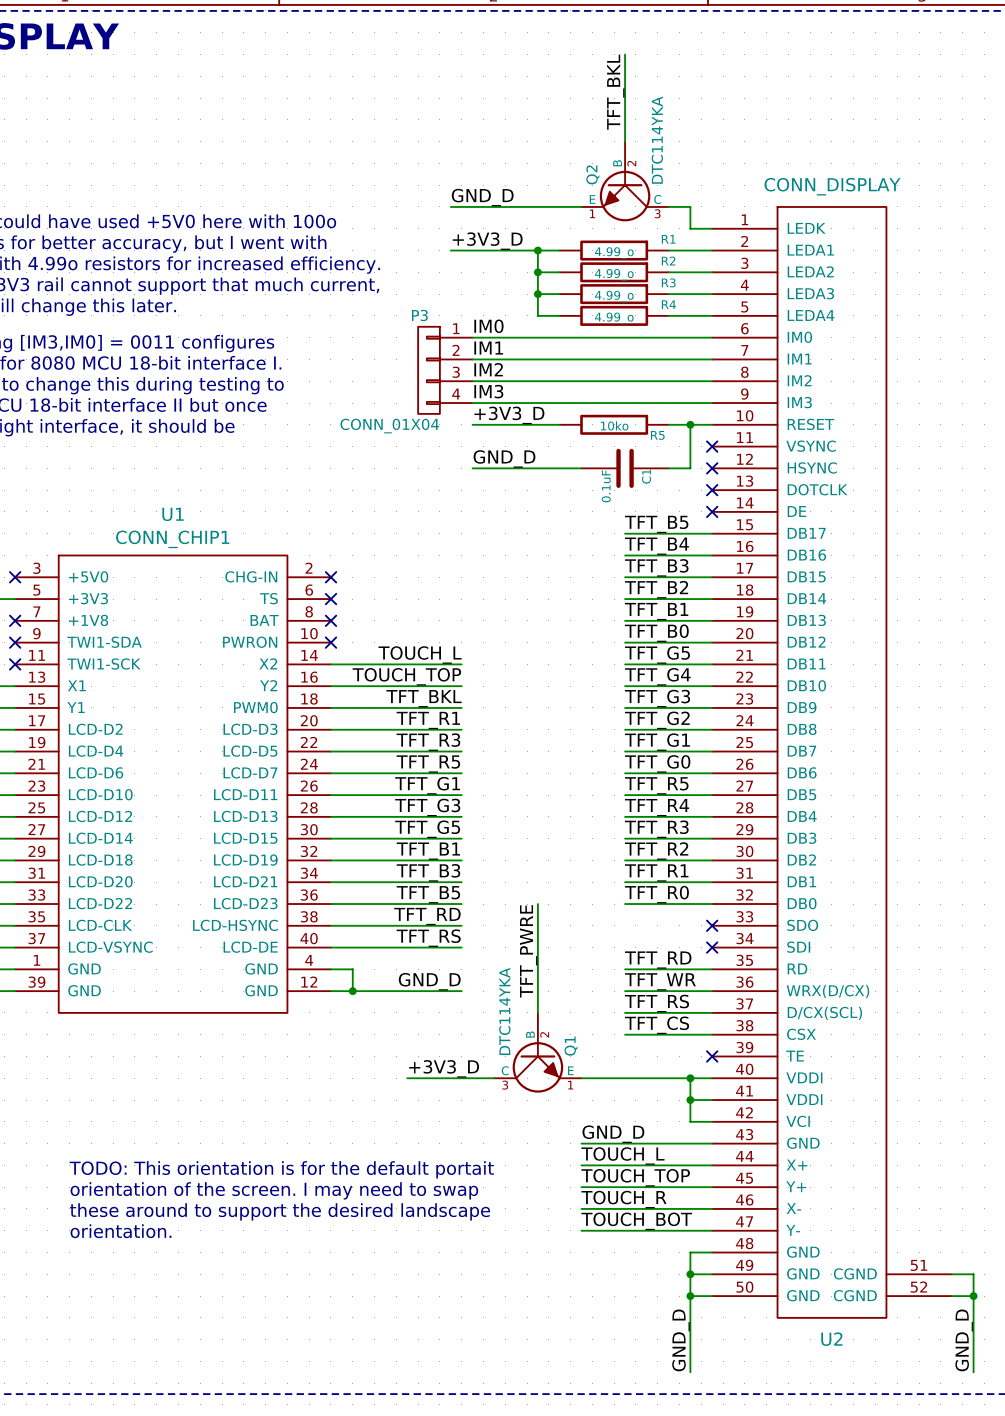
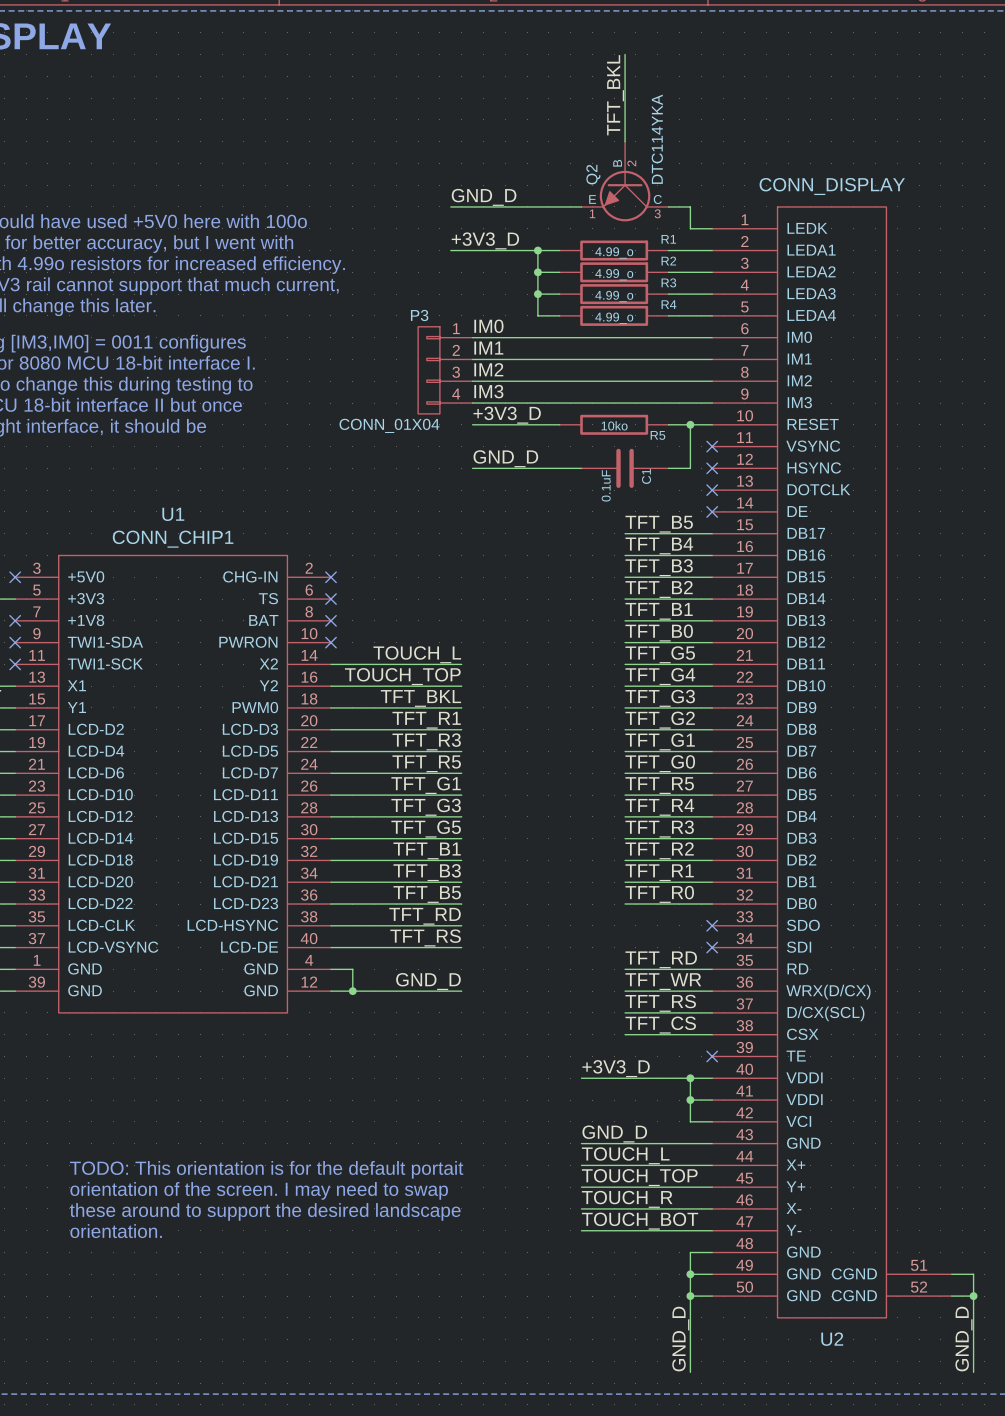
wire: (537, 904) (537, 1012) -> none
label: TFT_PWRE (528, 951) -> none
Q1: DTC114YKA (537, 1052) -> none
label position: +3V3_D (444, 1068) -> +3V3_D (616, 1068)
wire: (407, 1078) (494, 1078) -> none

